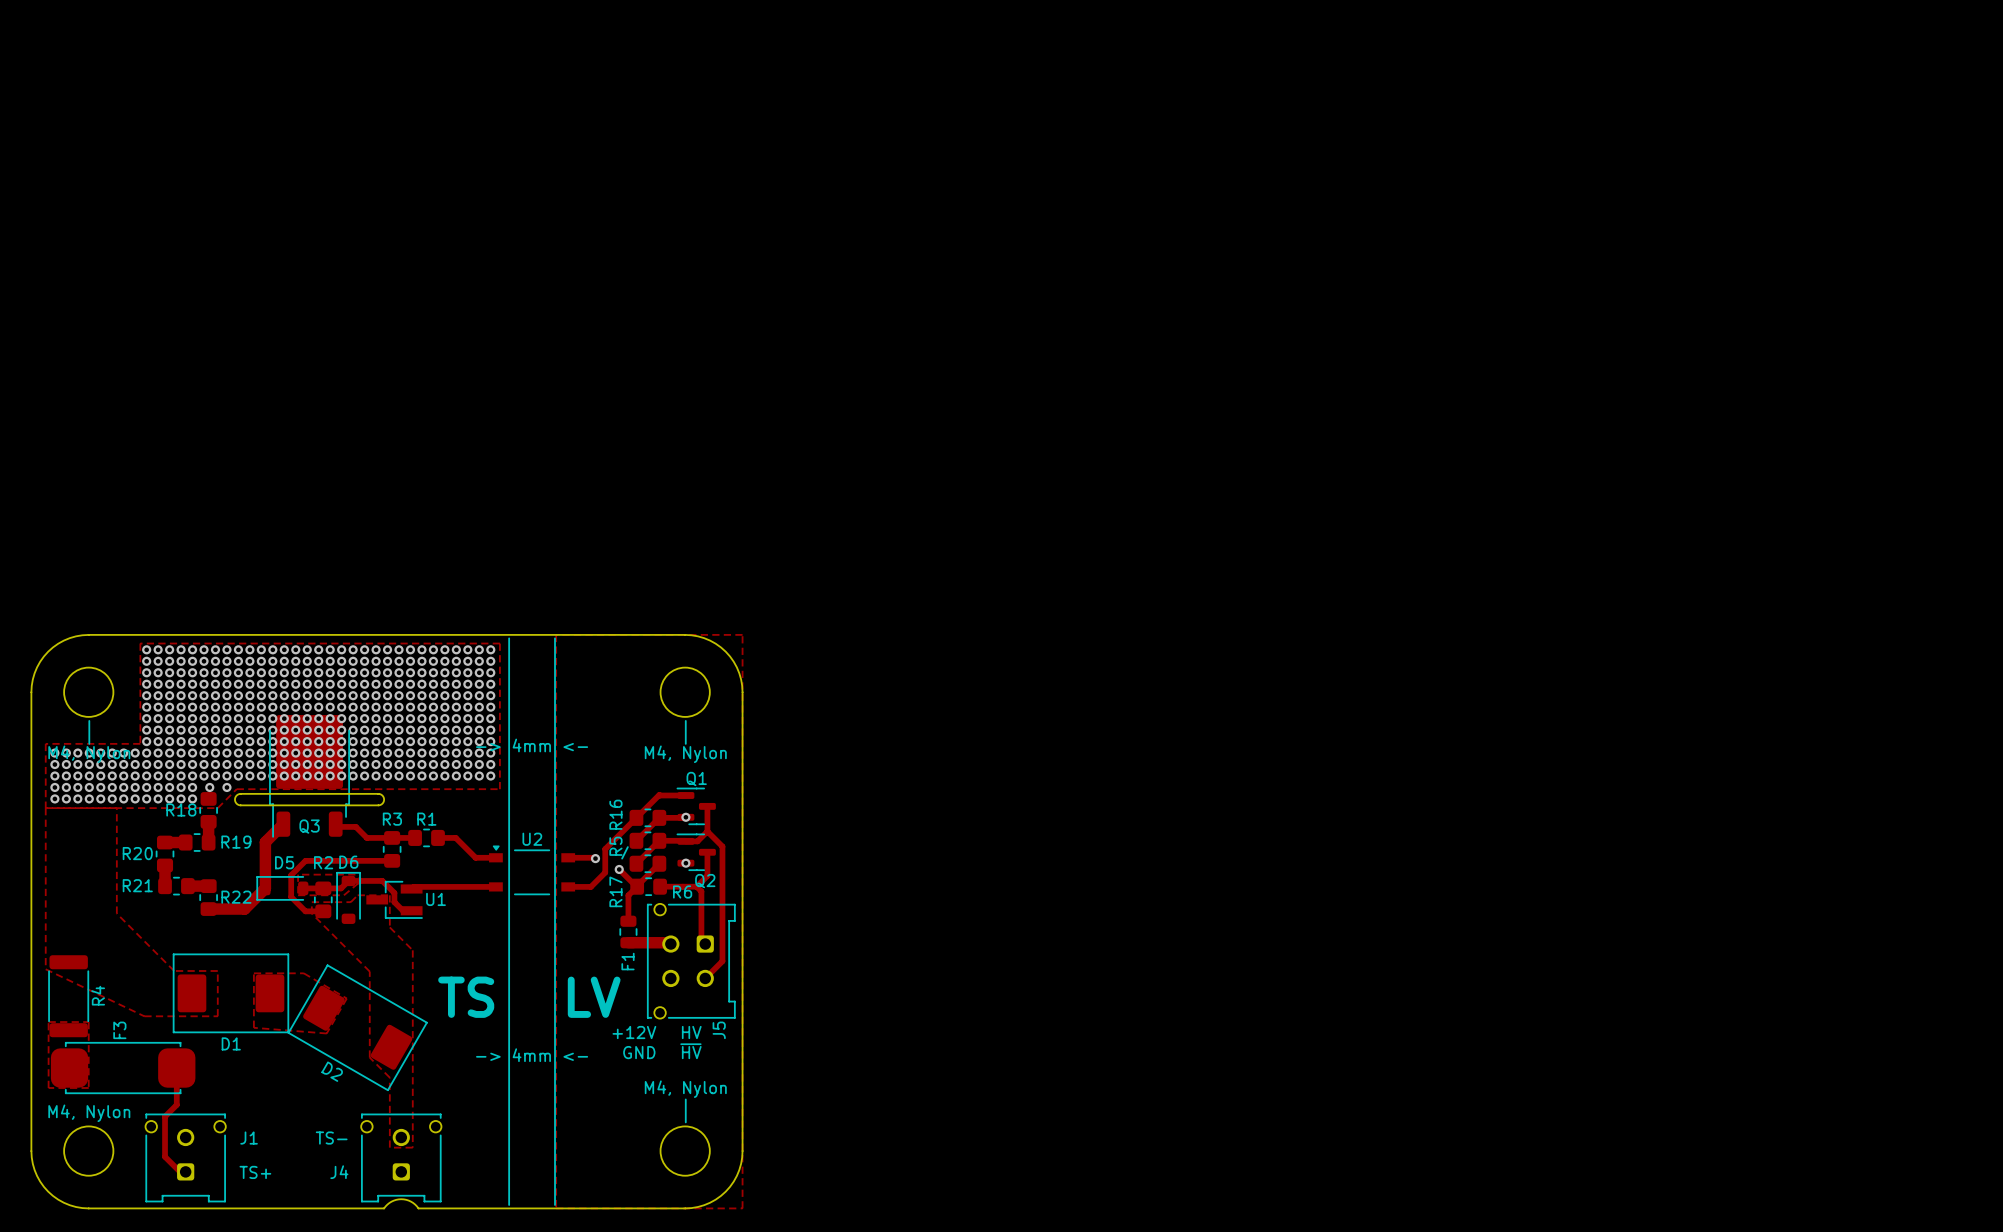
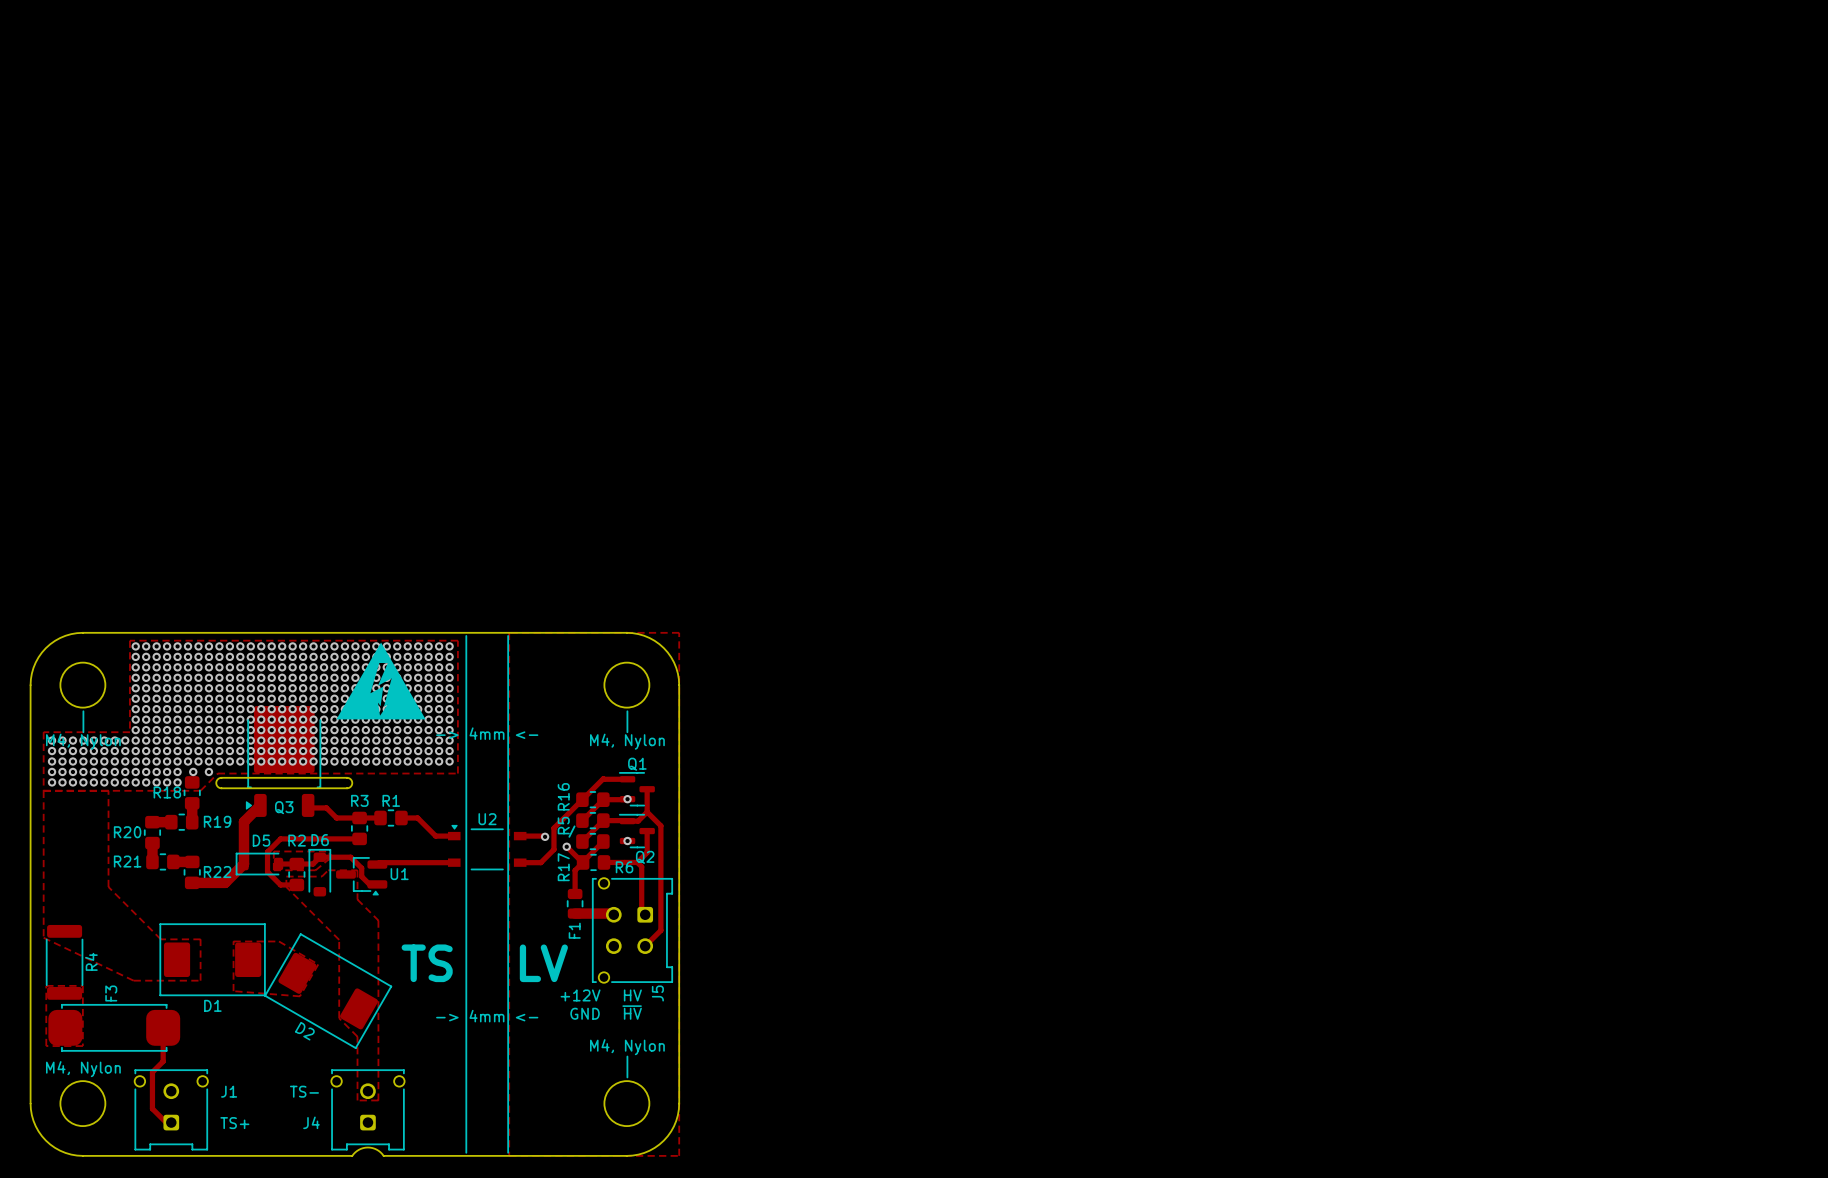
drawing: none -> [336, 642, 426, 720]
Q3 footprint: [269, 715, 350, 838] -> [245, 706, 321, 817]
U1 footprint: [366, 881, 423, 919] -> [336, 857, 388, 896]

